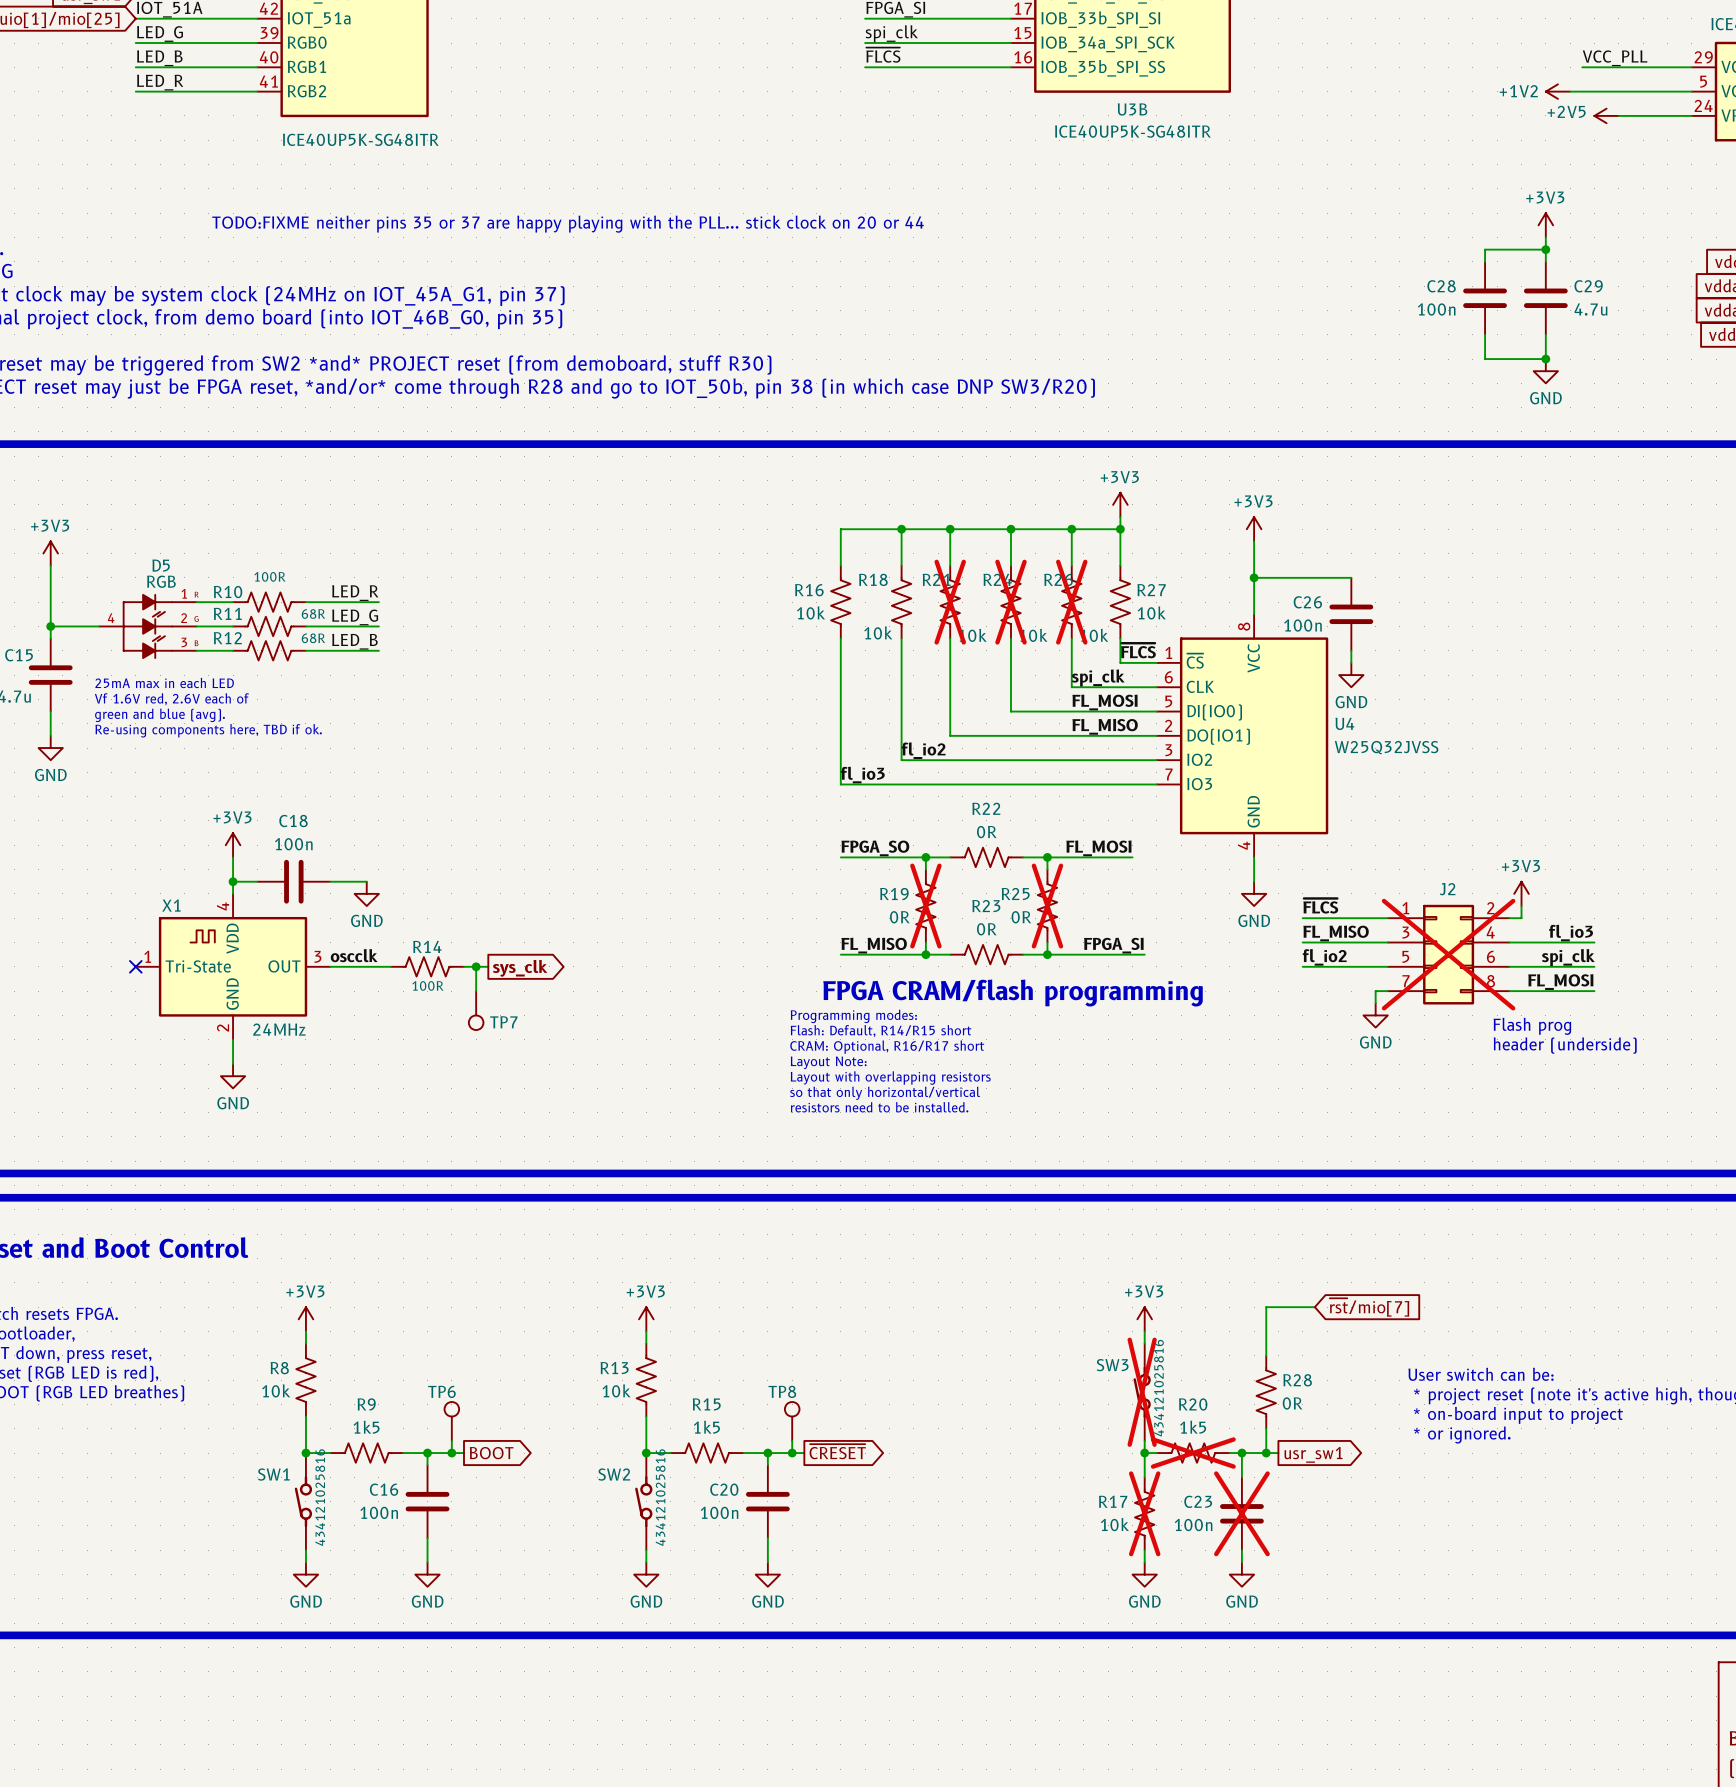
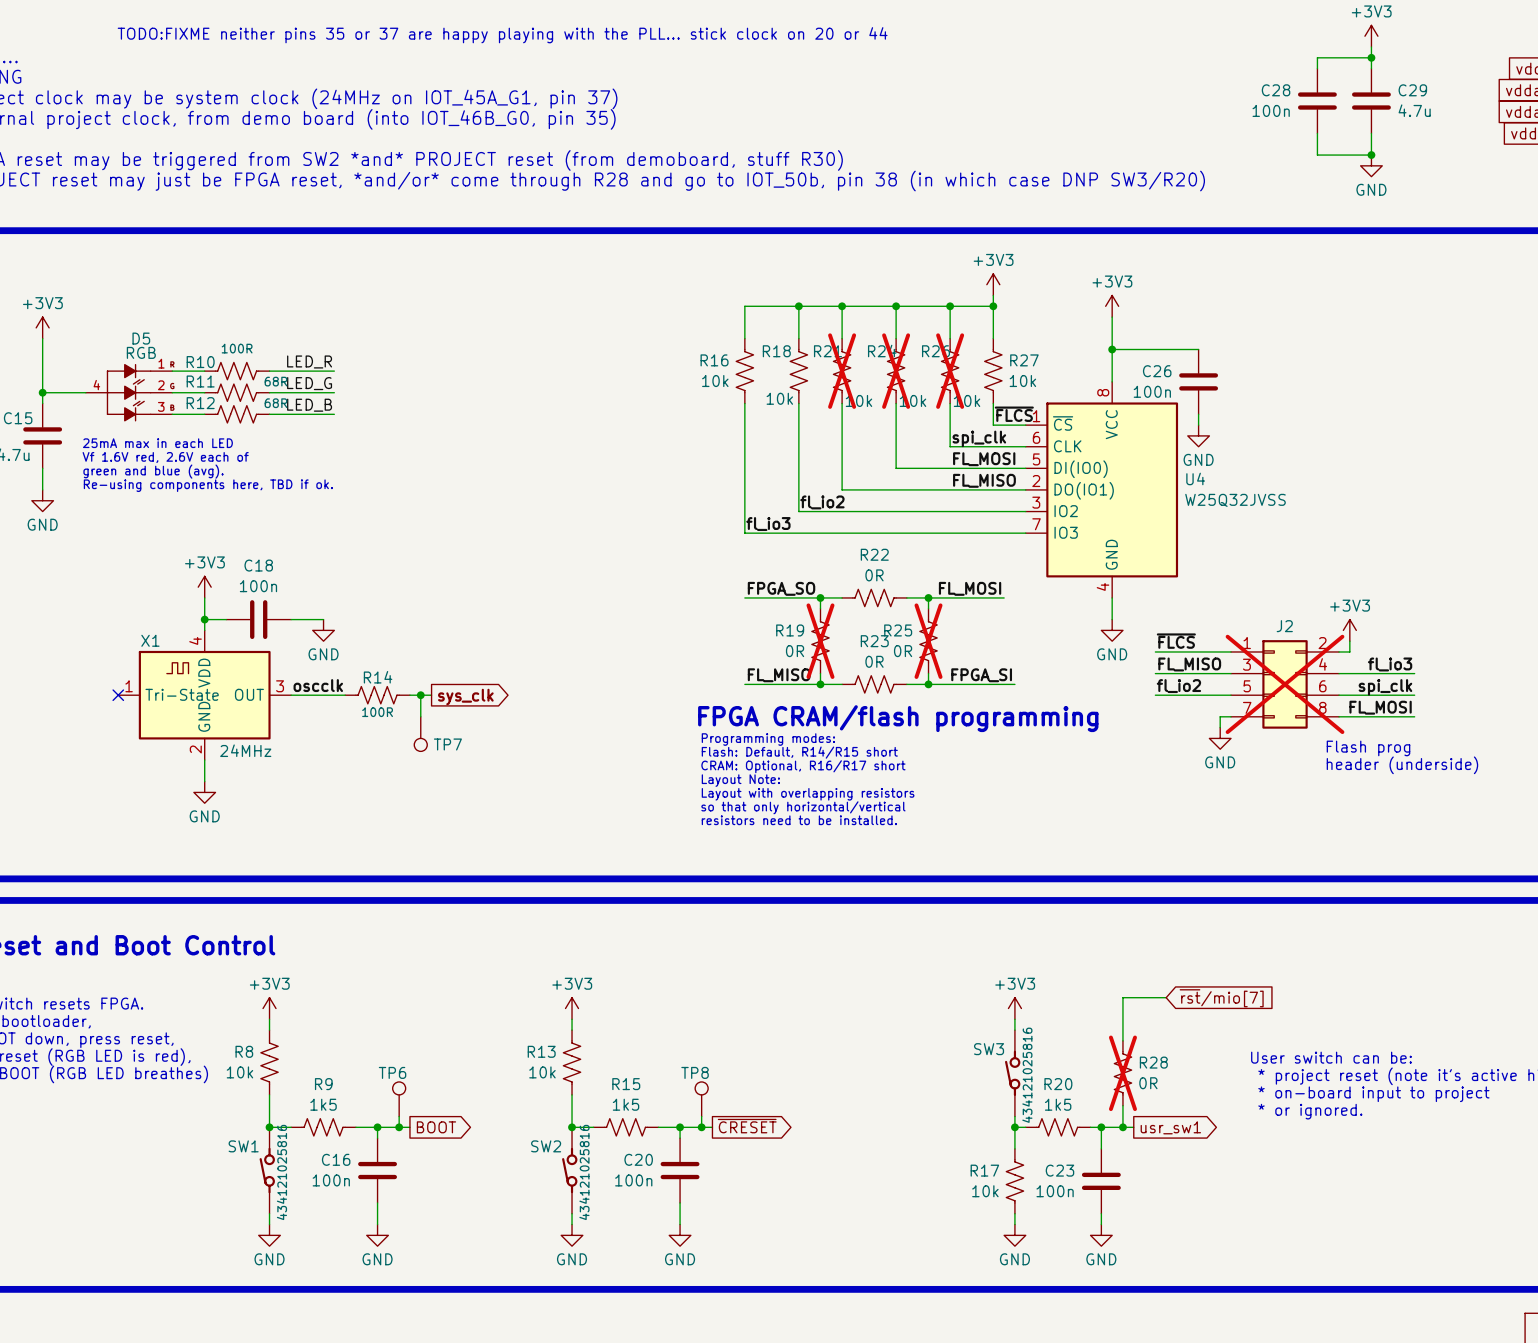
SW3 do-not-place cross: (1142, 1392) -> none
R28 do-not-place cross: none -> (1122, 1073)
R20 do-not-place cross: (1193, 1453) -> none
R17 do-not-place cross: (1144, 1513) -> none
C23 do-not-place cross: (1241, 1513) -> none

